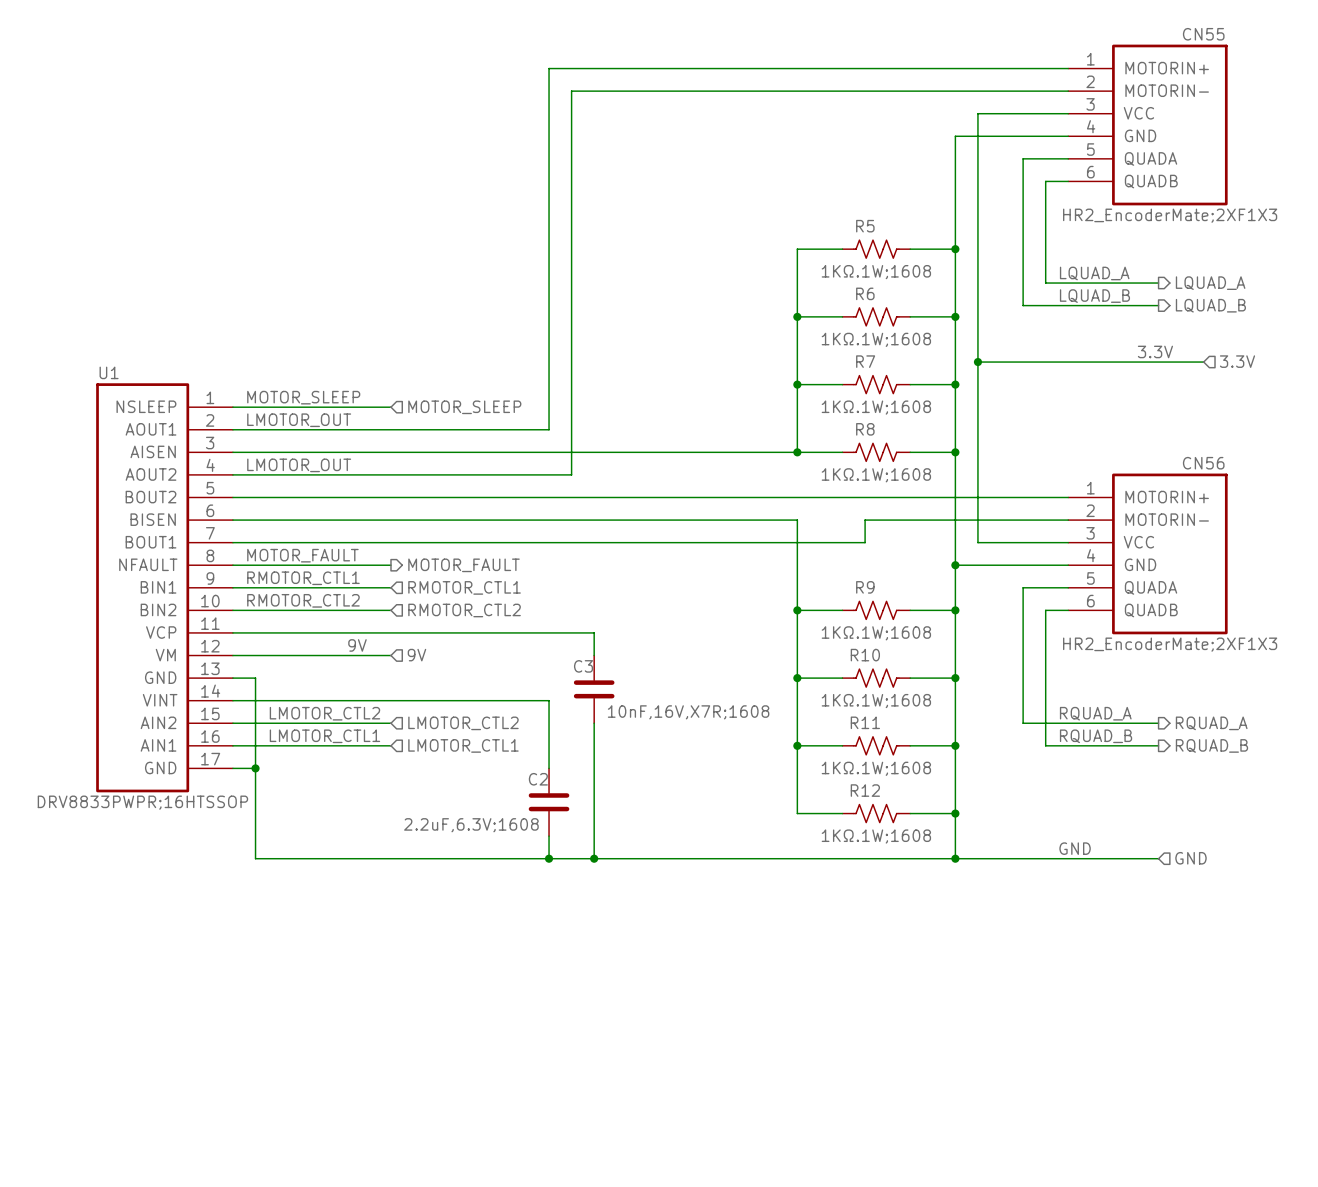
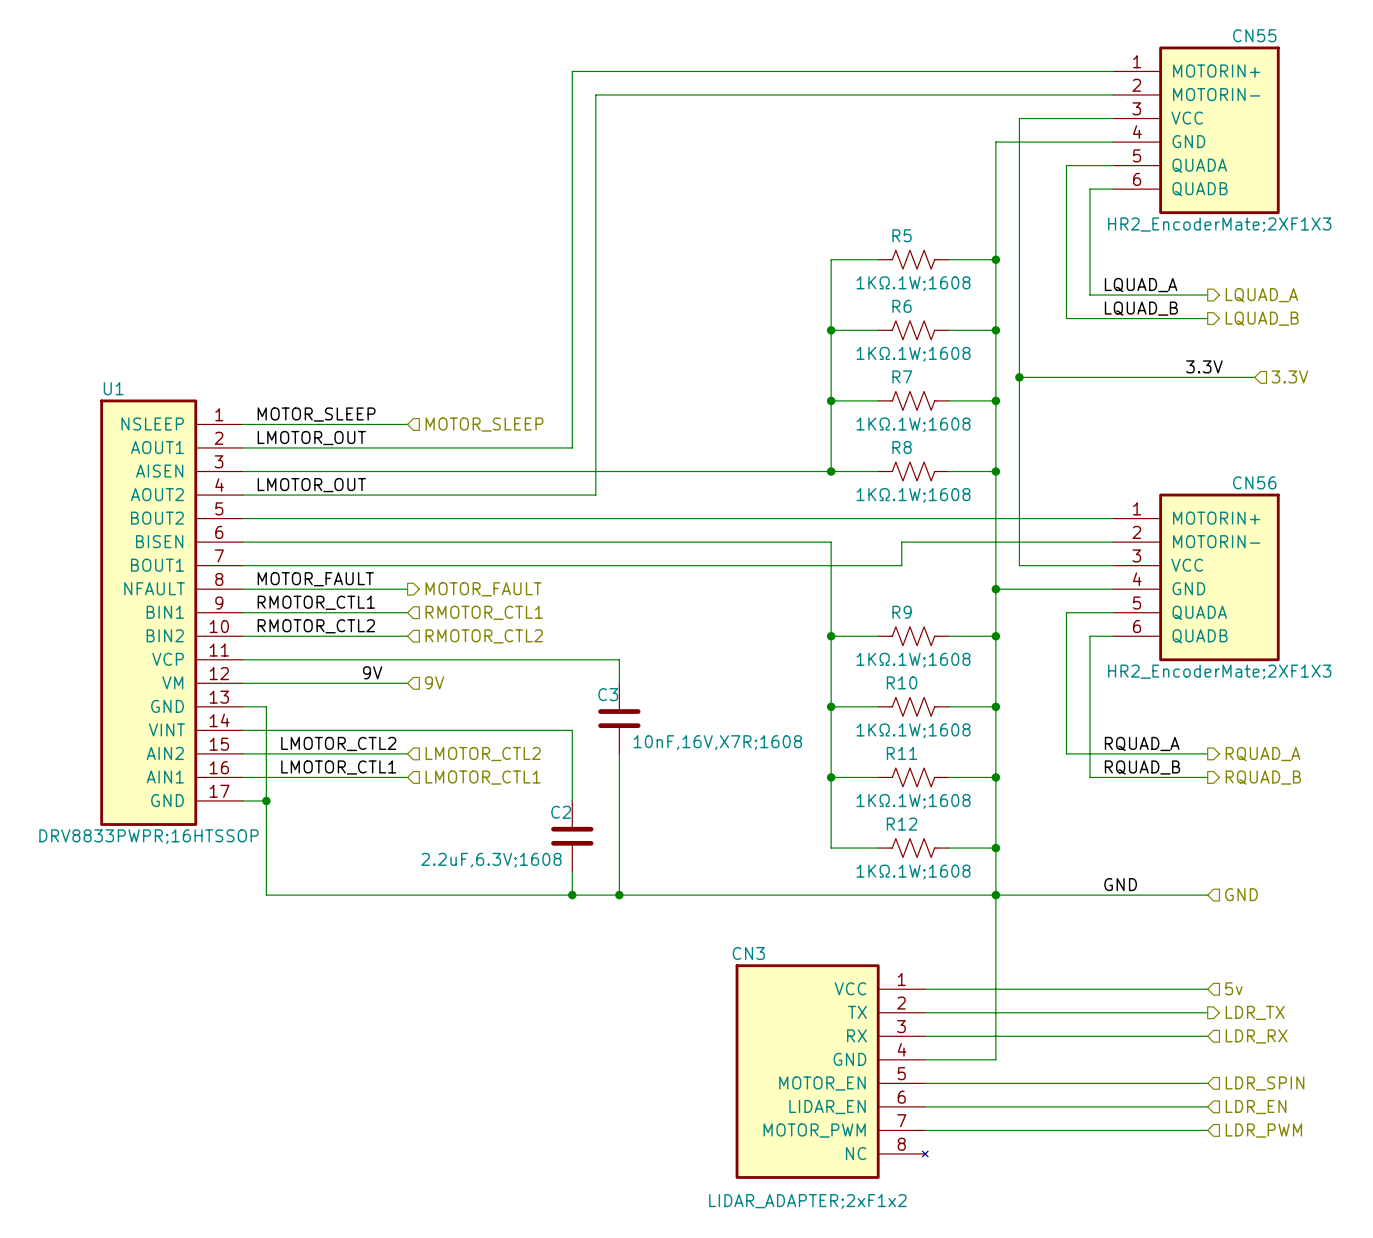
wire: none -> (995, 895) (995, 1059) (925, 1059)
hierarchical label: none -> 5v (1233, 988)
wire: none -> (925, 989) (1207, 989)
wire: none -> (925, 1012) (1207, 1012)
hierarchical label: none -> LDR_TX (1255, 1012)
wire: none -> (925, 1036) (1207, 1036)
hierarchical label: none -> LDR_RX (1256, 1036)
CN3: none -> LIDAR_ADAPTER;2xF1x2 (831, 1071)
wire: none -> (925, 1083) (1207, 1083)
hierarchical label: none -> LDR_SPIN (1265, 1083)
wire: none -> (925, 1106) (1207, 1106)
hierarchical label: none -> LDR_EN (1256, 1107)
wire: none -> (925, 1130) (1207, 1130)
hierarchical label: none -> LDR_PWM (1263, 1130)

